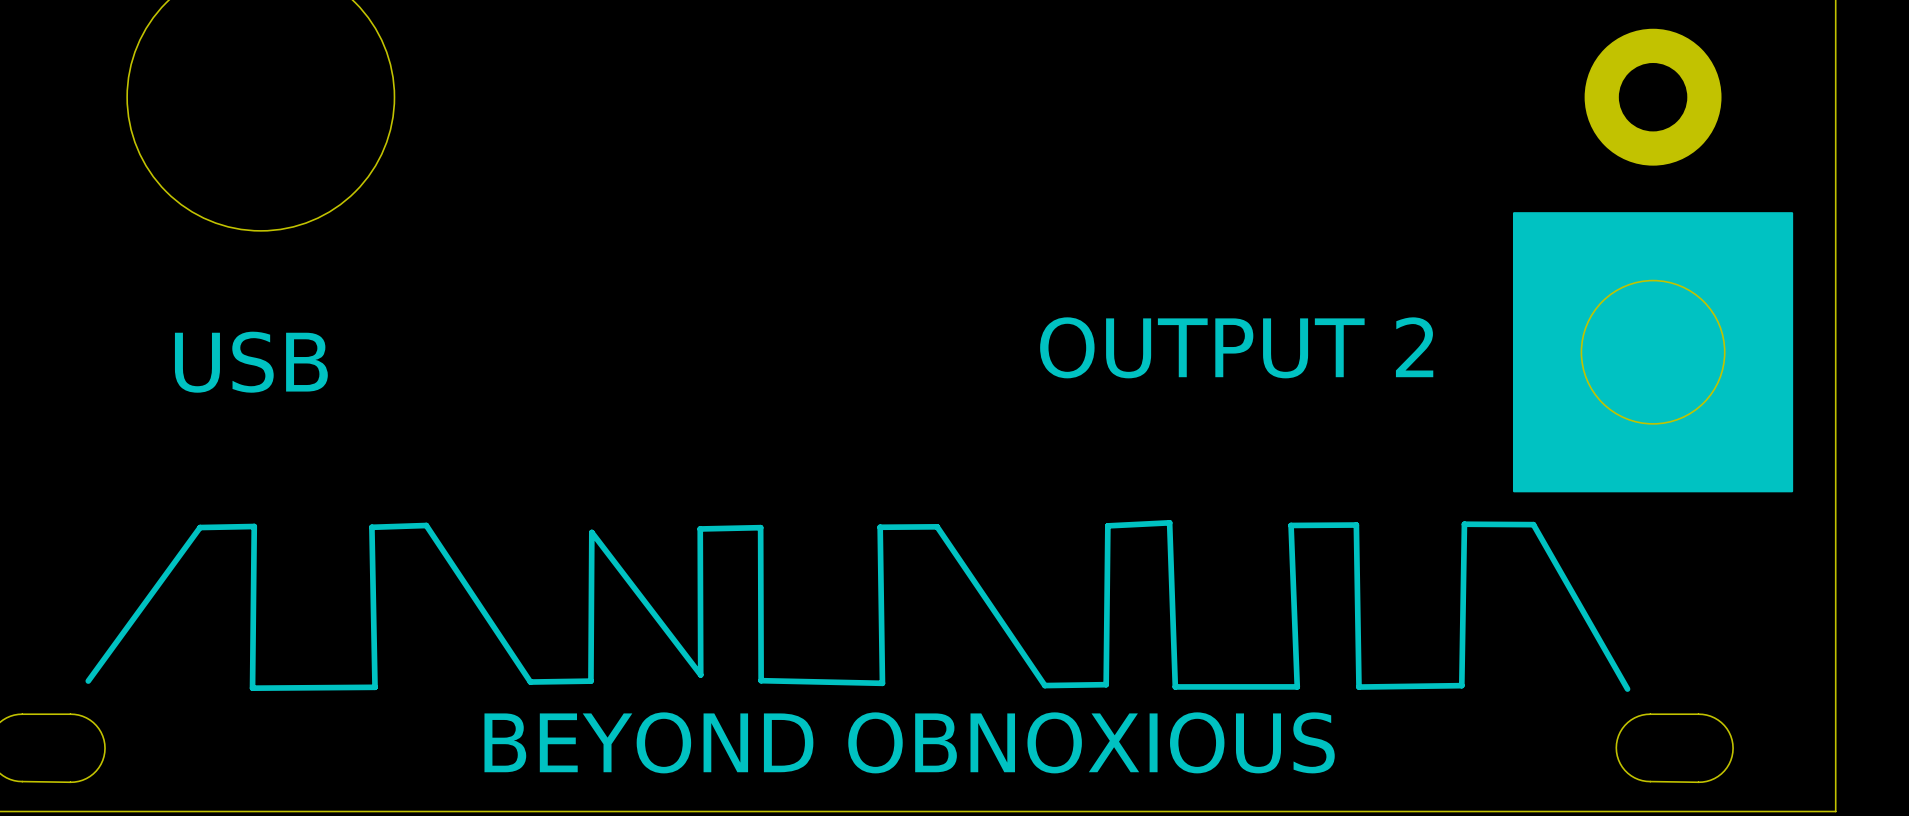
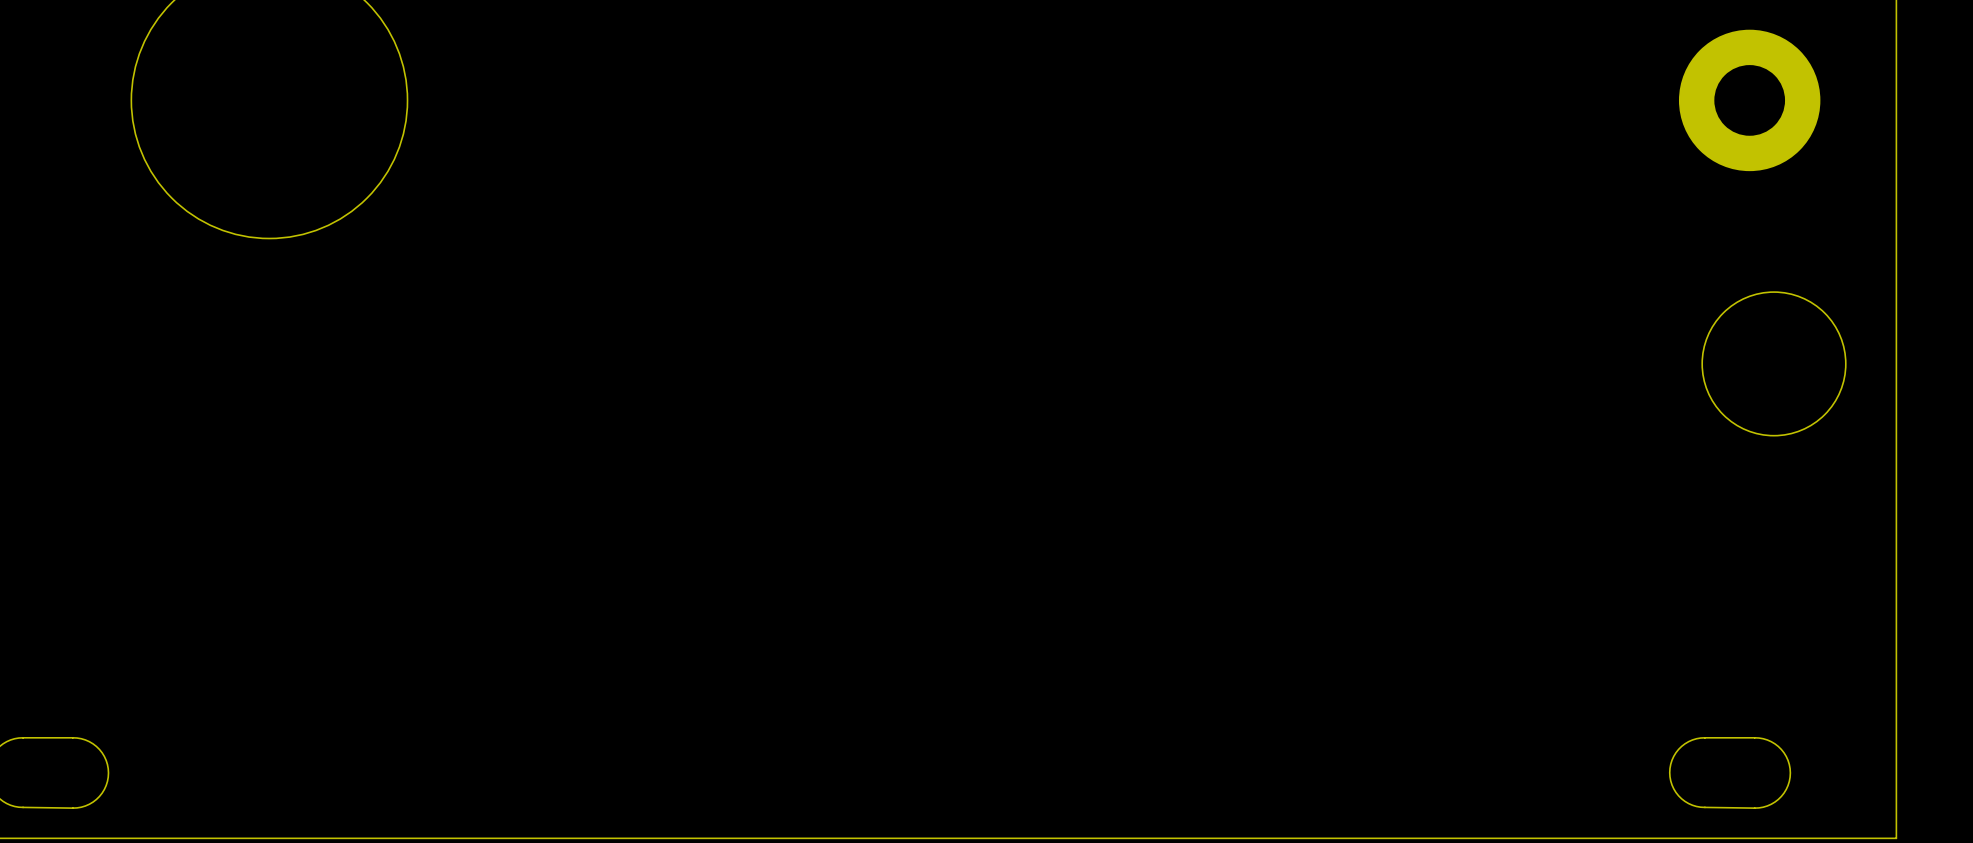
part position: (1653, 97) -> (1749, 100)
drawing: [1512, 212, 1794, 493] -> none
round board edge: [1580, 280, 1726, 425] -> none
round board edge: none -> [1701, 291, 1847, 437]
text: OUTPUT 2 (1236, 347) -> none
text: USB (251, 362) -> none
line: (88, 681) (200, 527) (254, 526) (252, 688) (375, 687) (371, 527) (426, 525) (530, 682) (590, 681) (591, 532) (700, 674) (700, 528) (760, 527) (761, 680) (882, 683) (880, 527) (937, 526) (1044, 685) (1106, 684) (1107, 525) (1169, 522) (1175, 686) (1297, 686) (1291, 525) (1356, 525) (1358, 687) (1461, 685) (1464, 524) (1533, 524) (1627, 689) -> none
text: BEYOND OBNOXIOUS (909, 742) -> none

